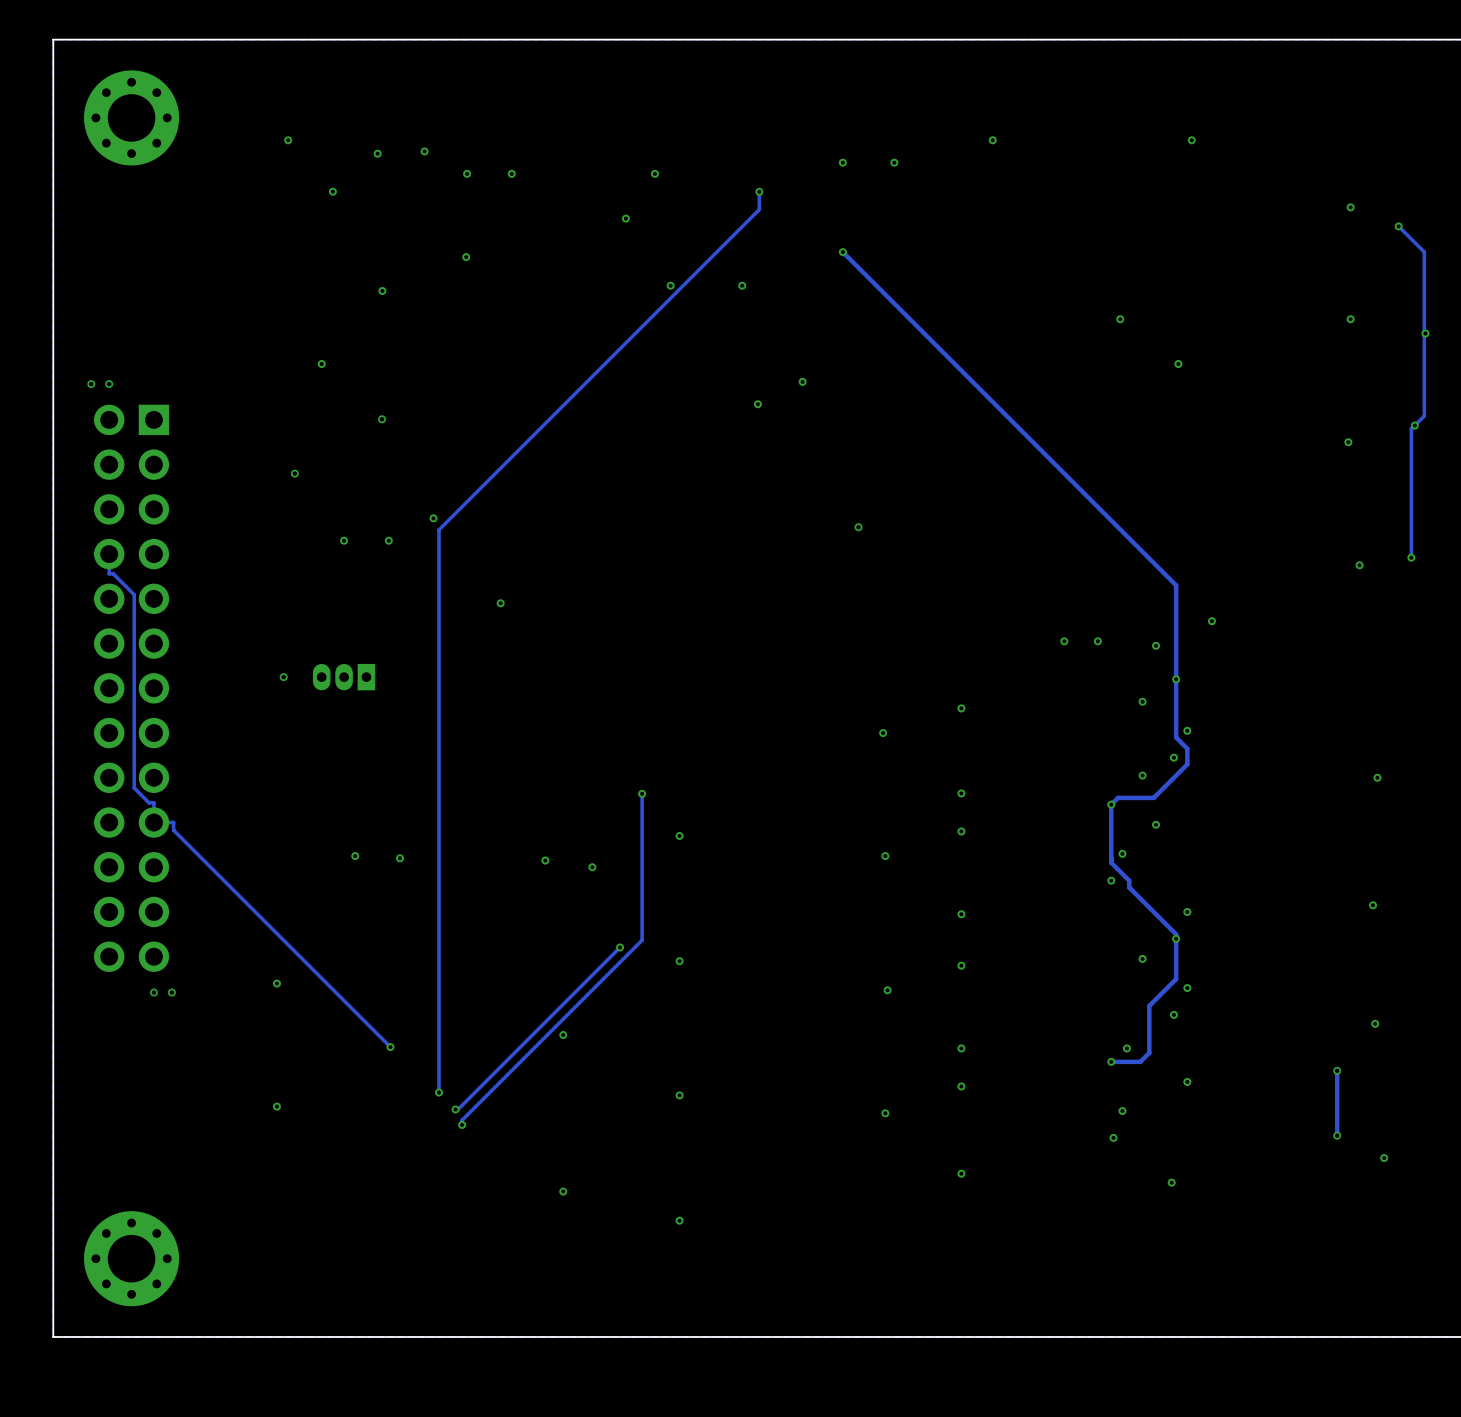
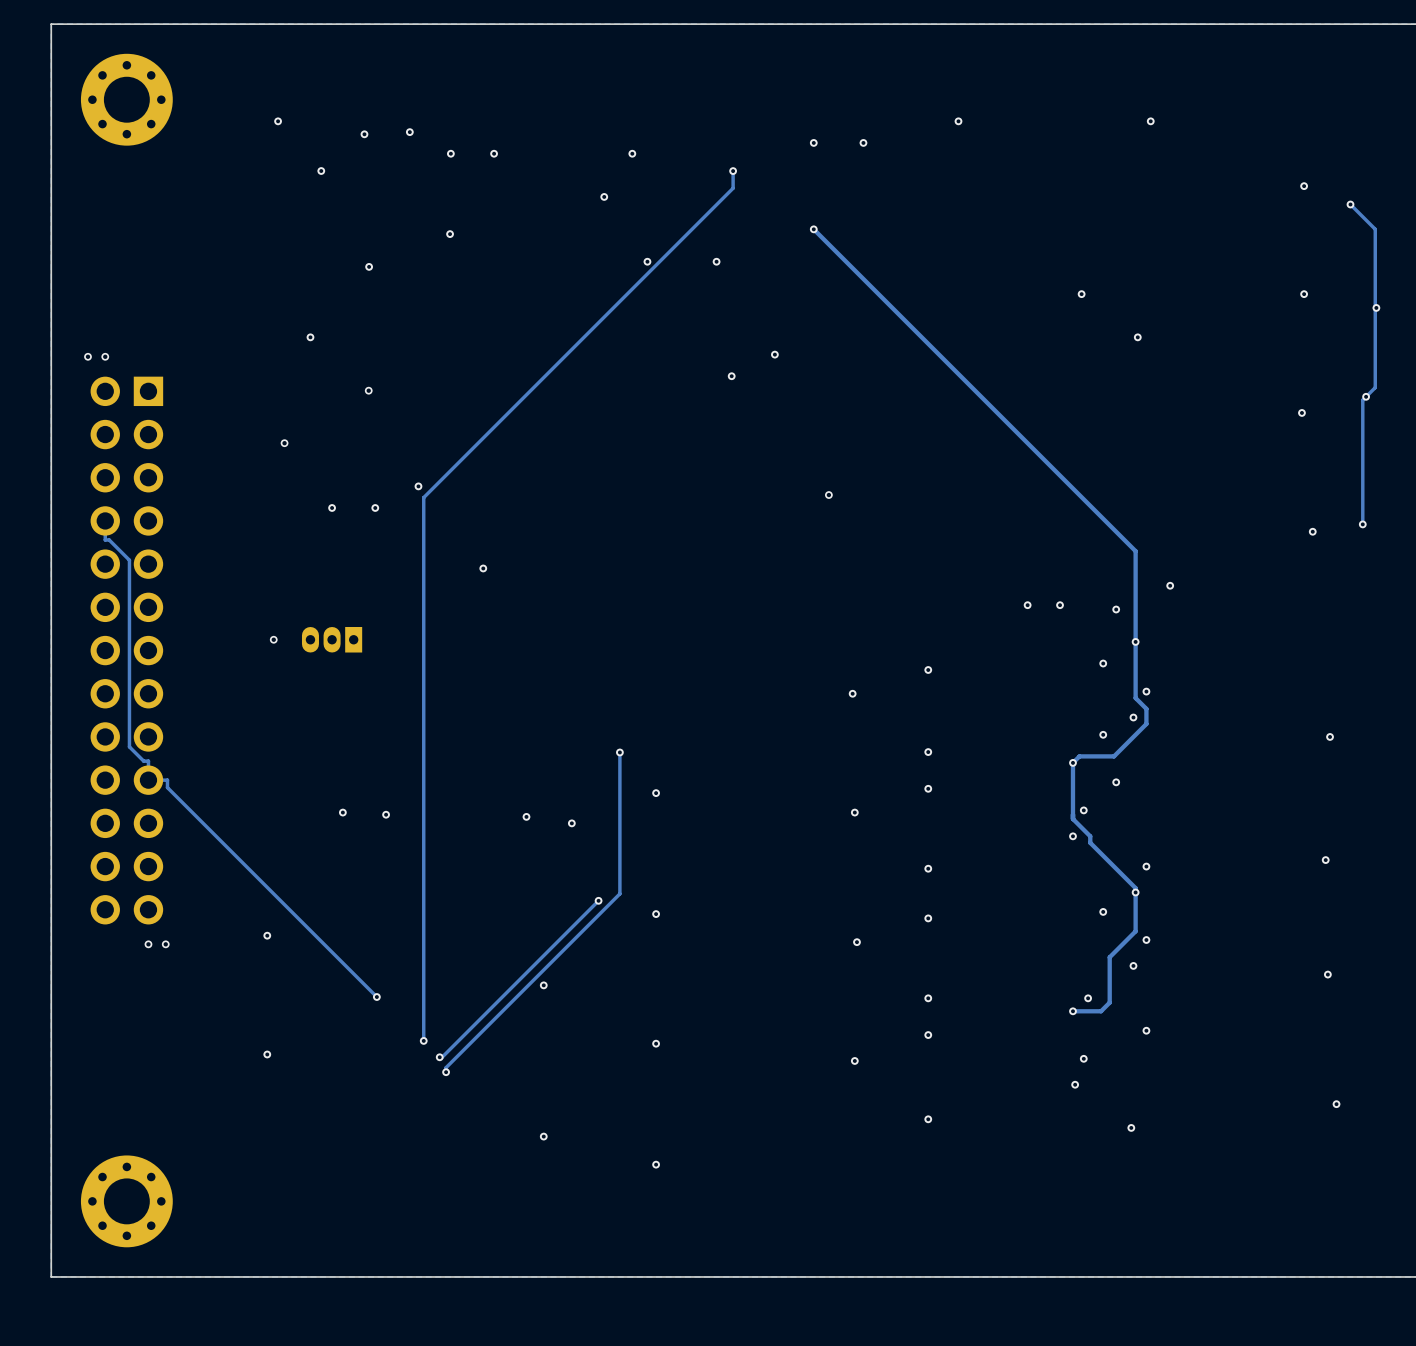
track: (1337, 1070) (1337, 1135) -> none
via: (1337, 1070) -> none
via: (1337, 1135) -> none

